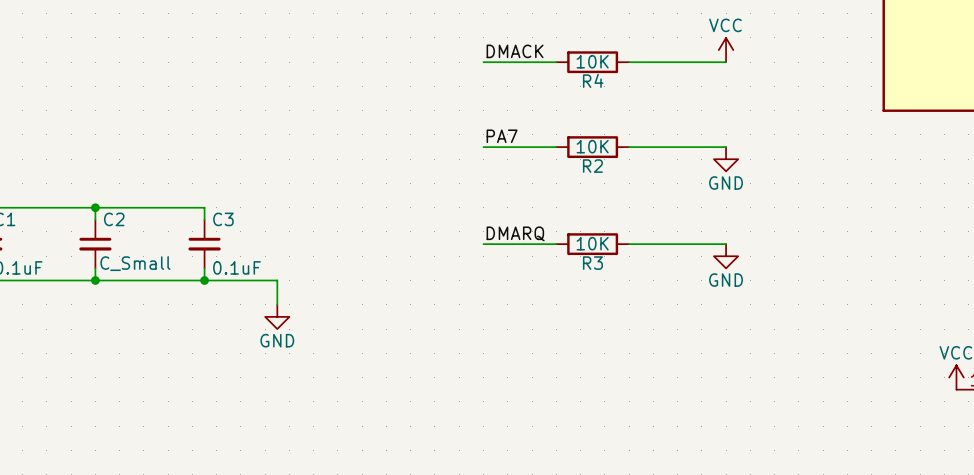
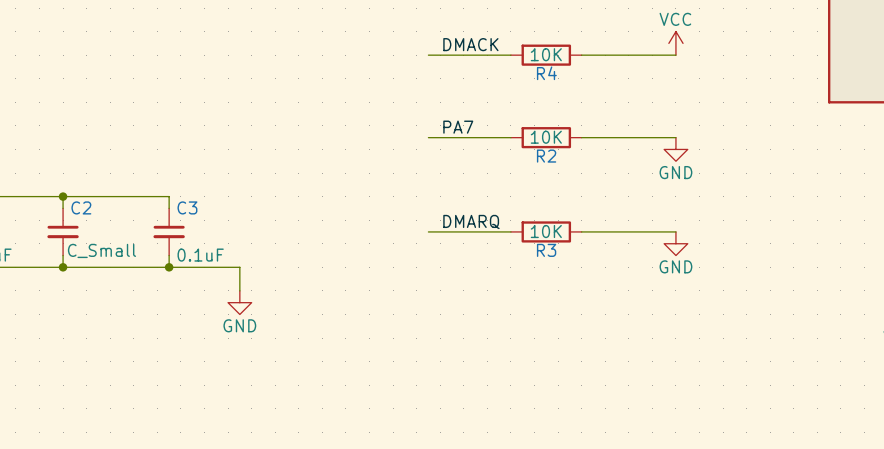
wire: none -> (428, 55) (440, 55)
wire: none -> (428, 137) (440, 137)
wire: none -> (428, 231) (440, 231)

